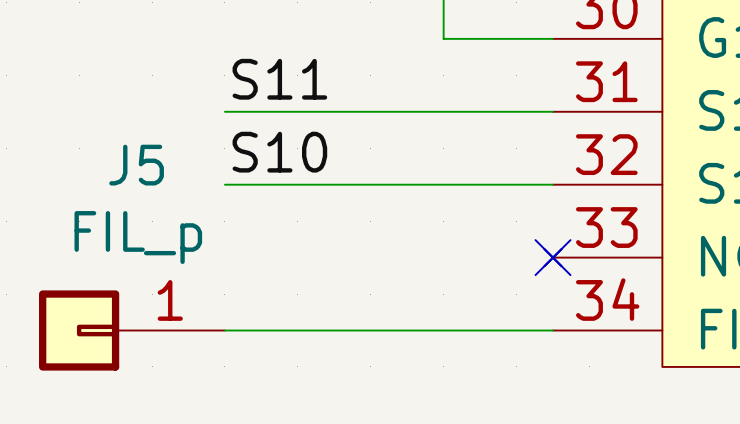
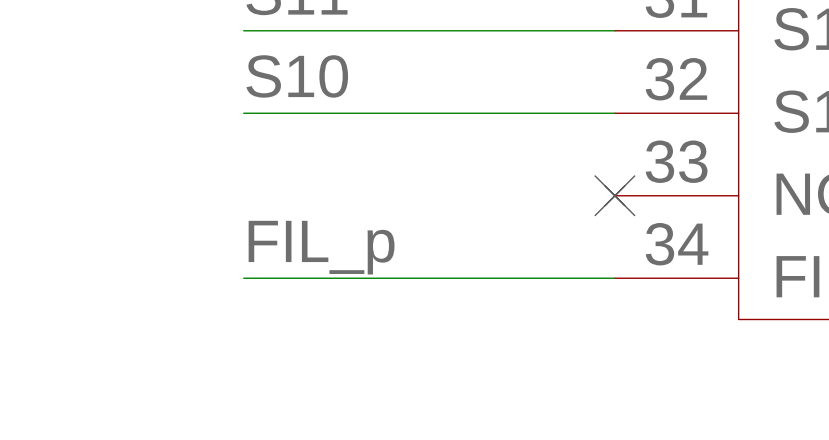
label: none -> FIL_p (321, 247)
J5: FIL_p (131, 330) -> none

